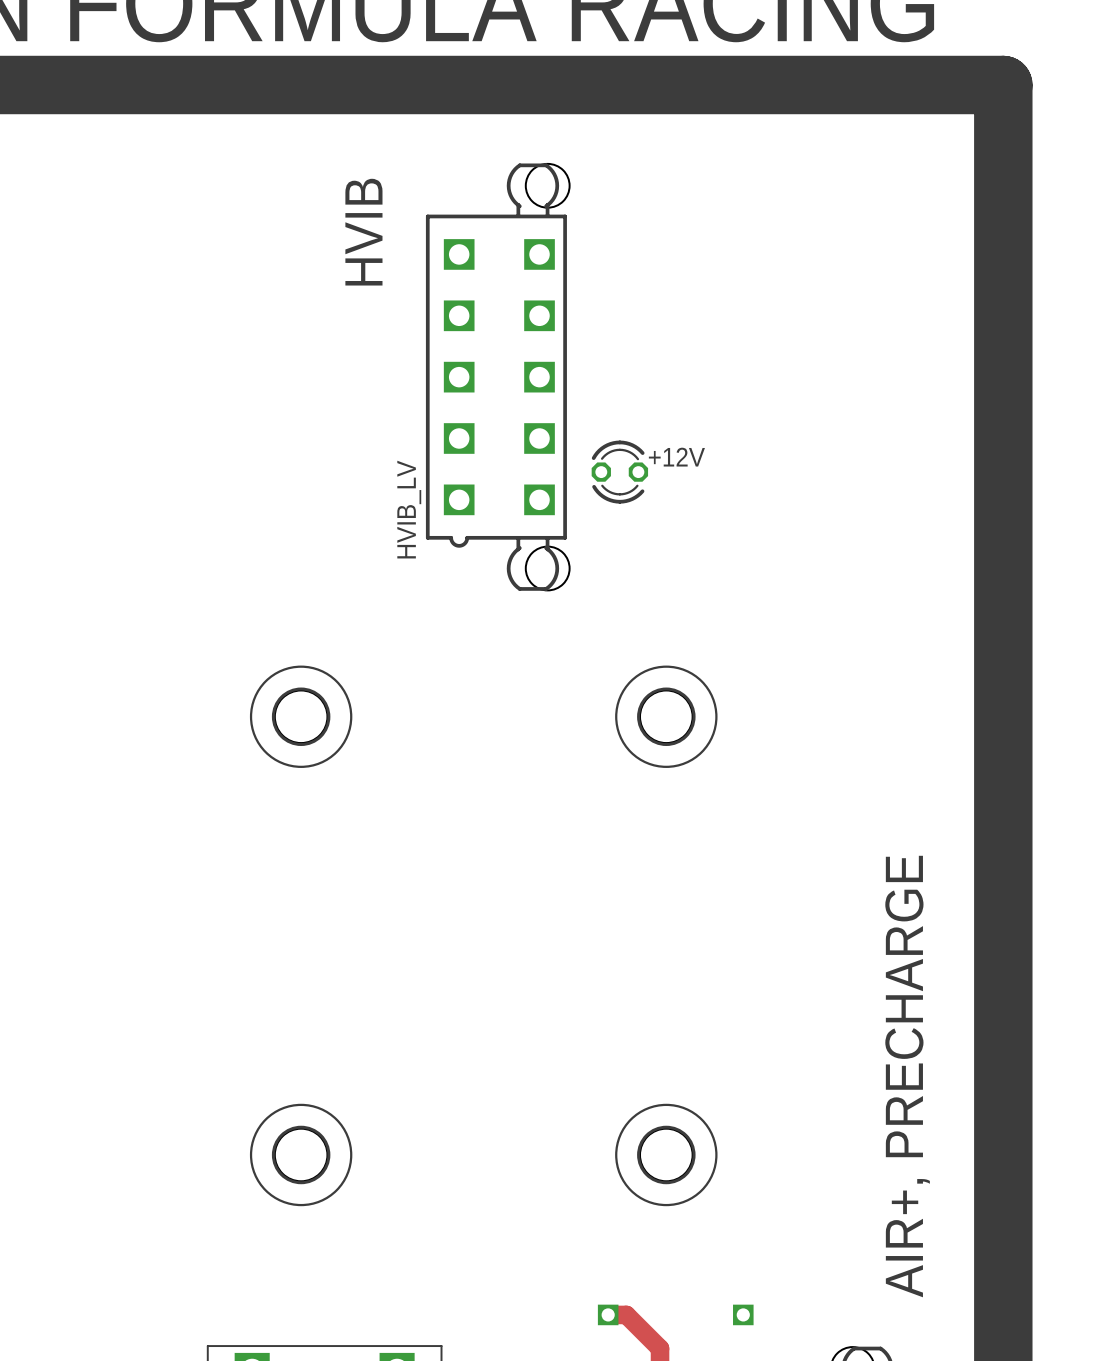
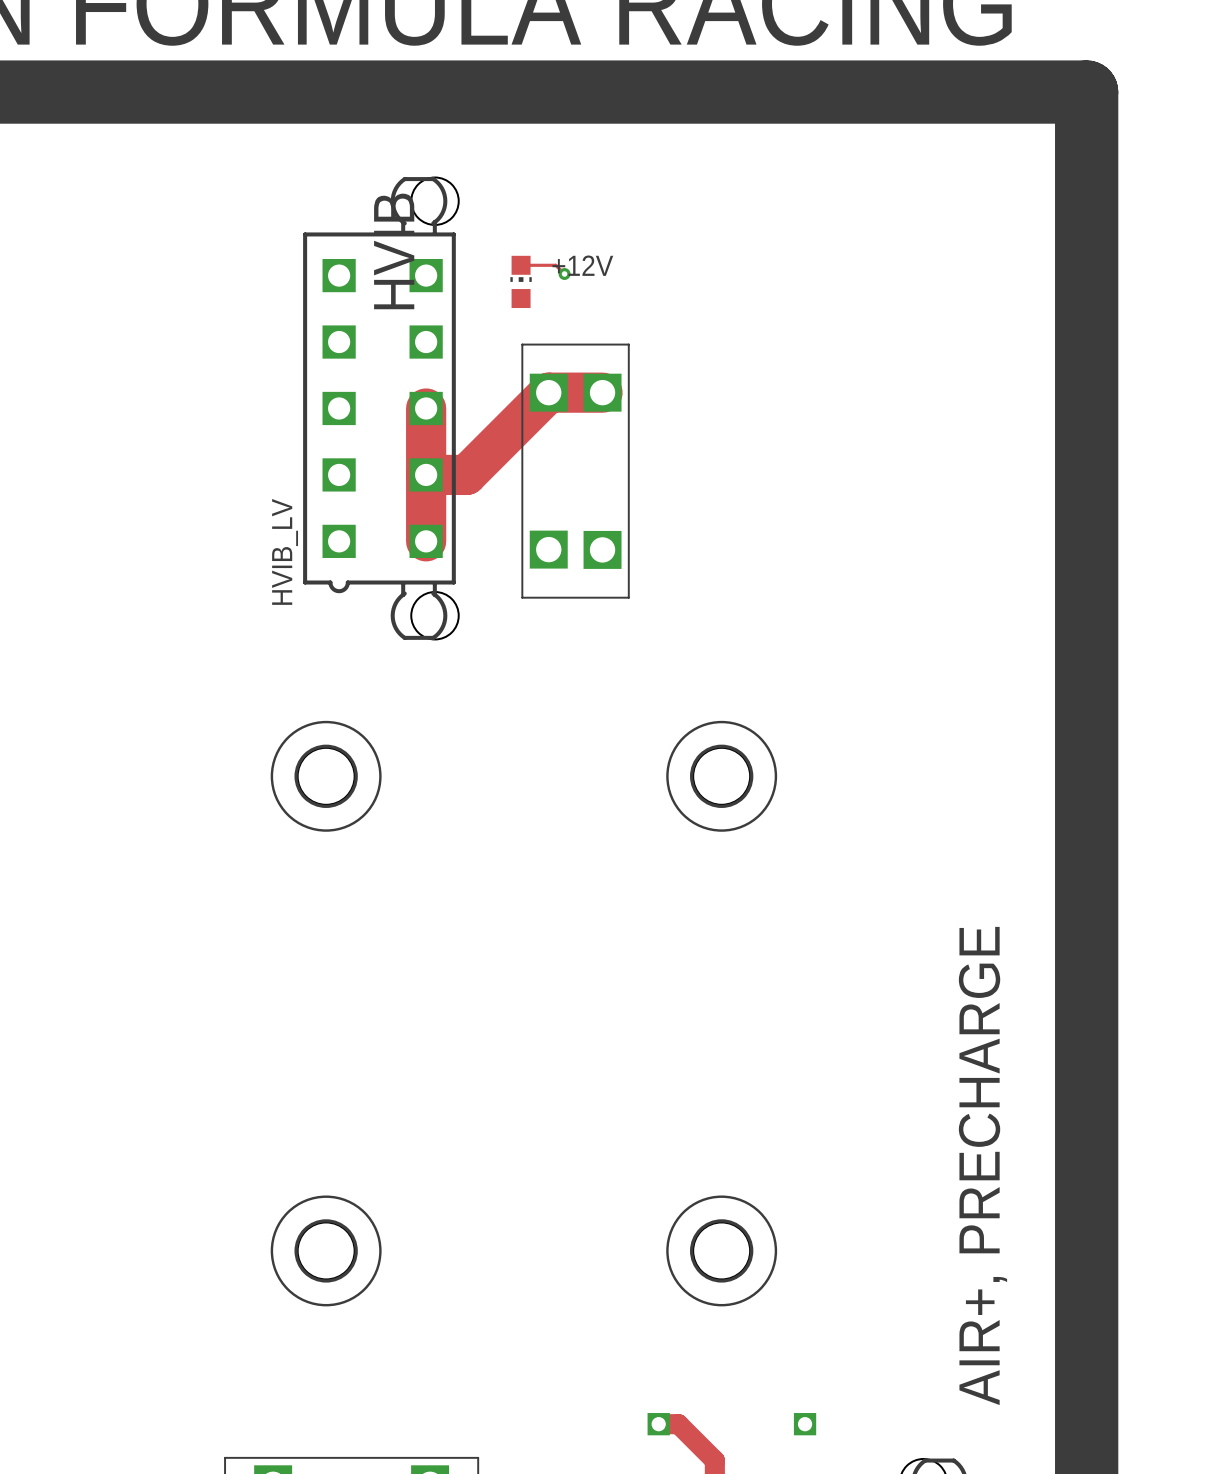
track: none -> (521, 265) (555, 265) (564, 274)
via: none -> (564, 274)
track: none -> (602, 392) (548, 392) (466, 474) (426, 474)
track: none -> (426, 408) (426, 541)
HVIB_LV position: (497, 377) -> (380, 408)
part: none -> (575, 471)
+12V footprint: [591, 440, 649, 504] -> [510, 255, 532, 309]

